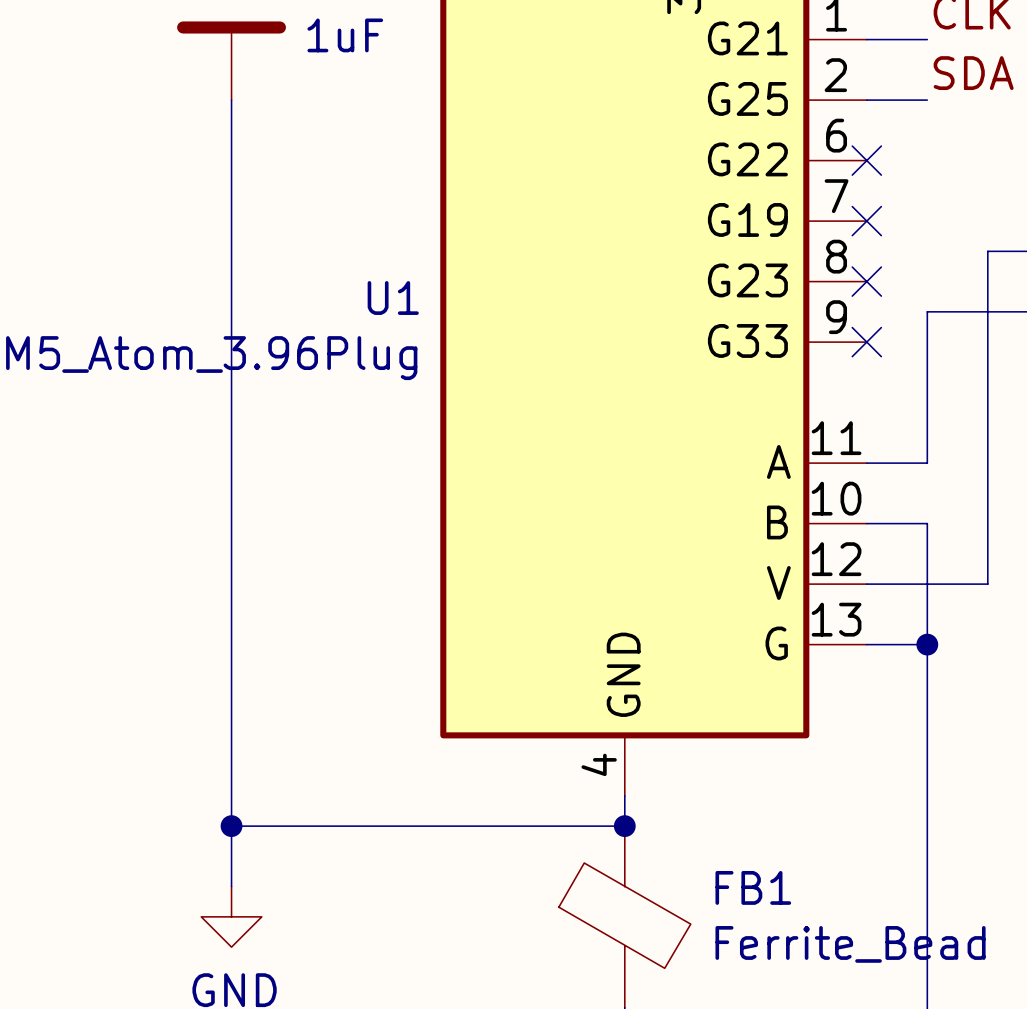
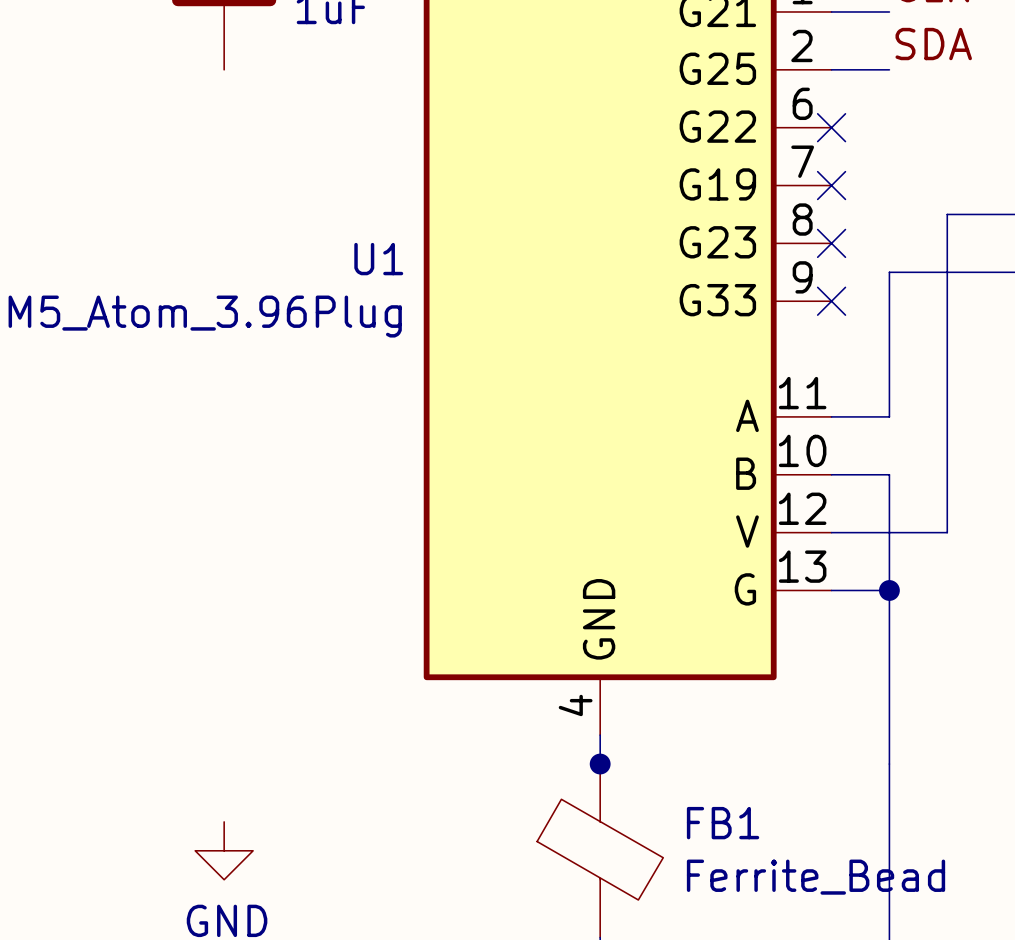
wire: (231, 100) (231, 886) -> none
wire: (231, 826) (624, 826) -> none
junction: (231, 826) -> none

